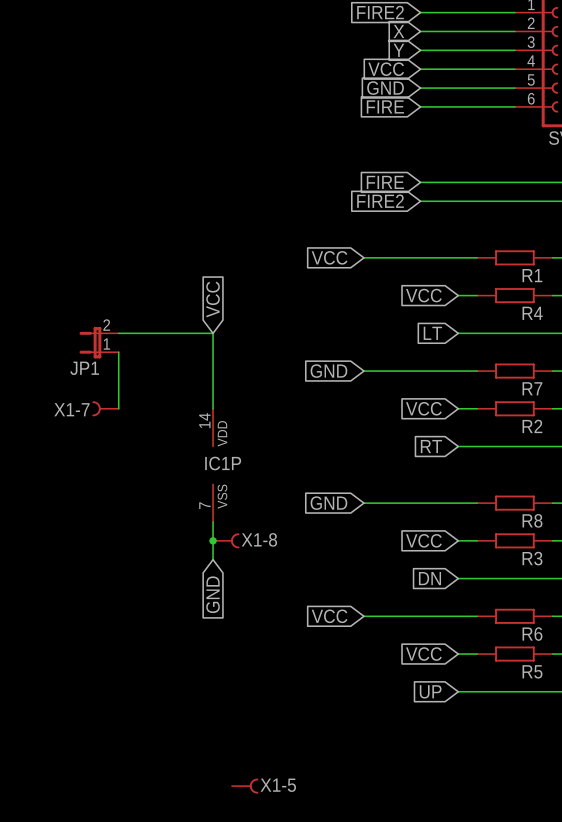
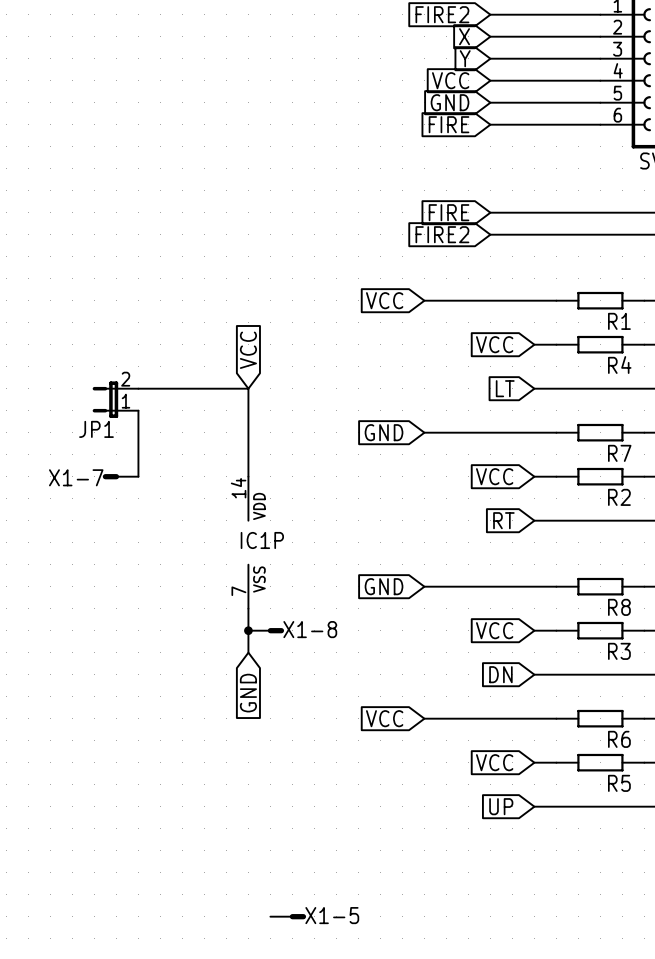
X1-7 symbol: [92, 401, 119, 417] -> [102, 474, 139, 480]
X1-8 symbol: [213, 533, 240, 549] -> [248, 628, 285, 634]
X1-5 symbol: [231, 778, 259, 794] -> [270, 914, 307, 920]

